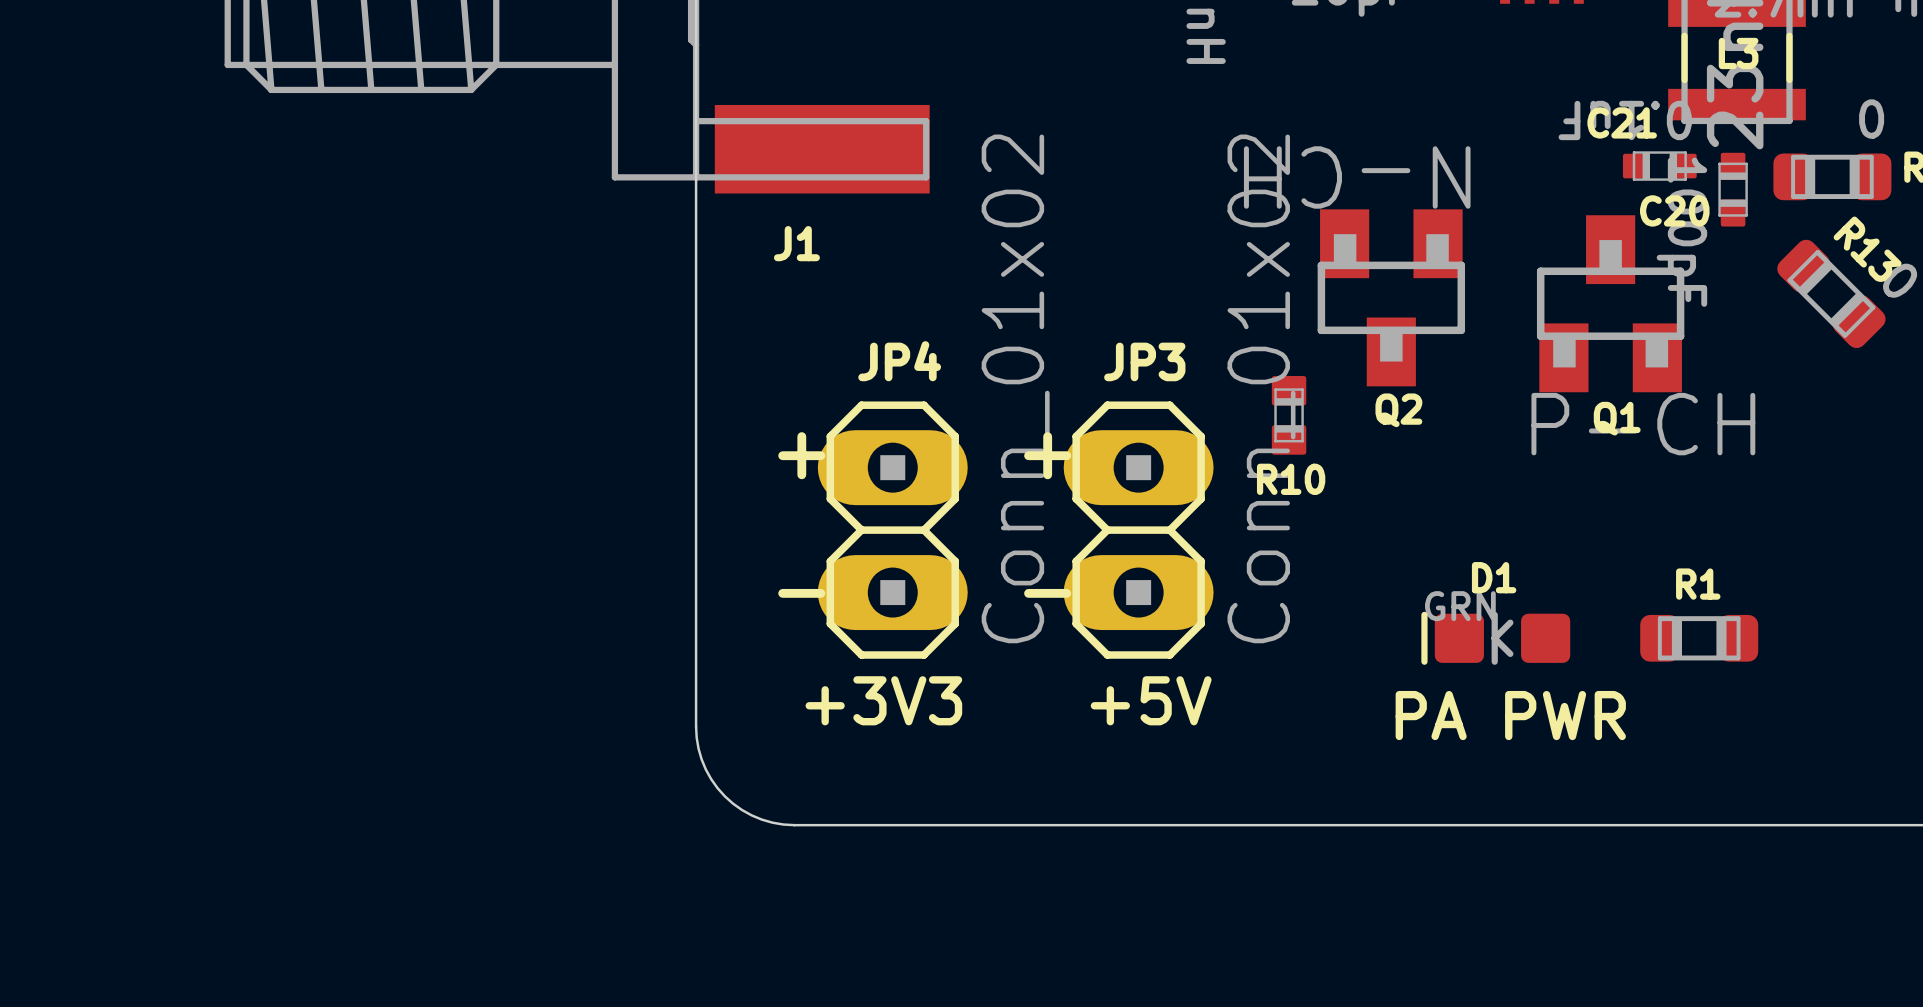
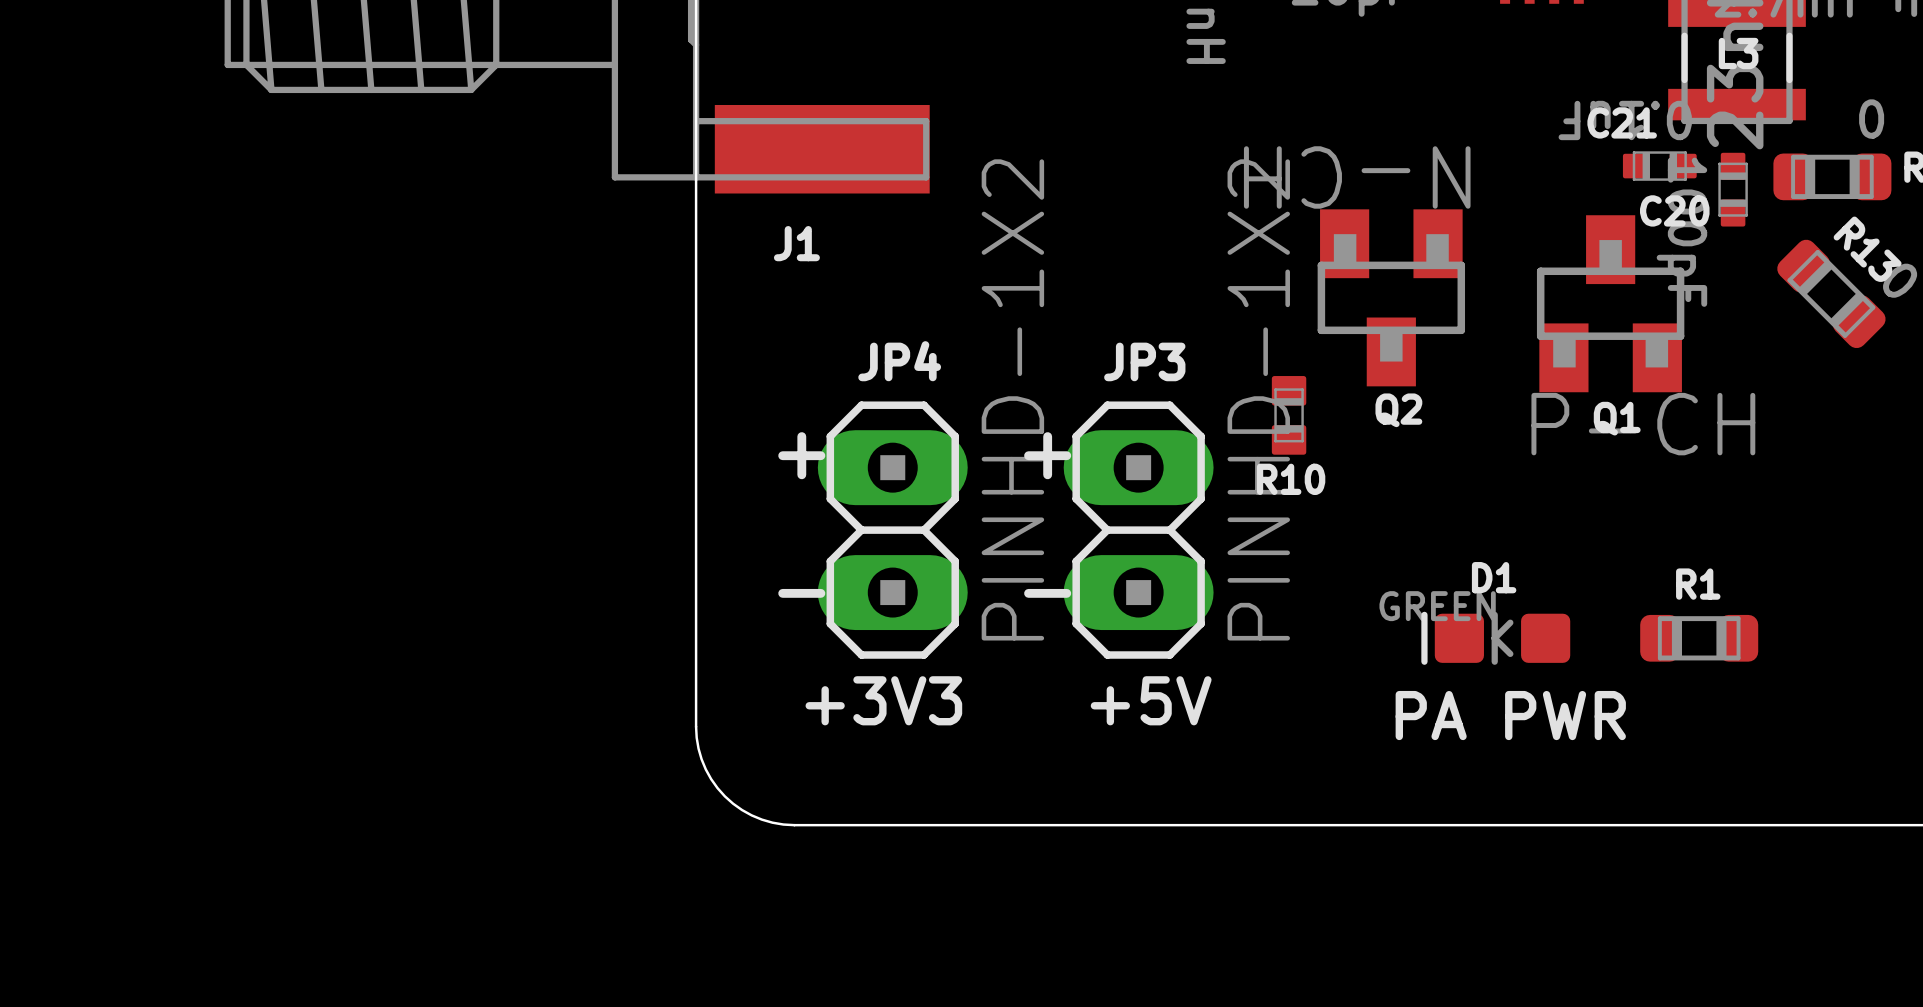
JP4 value: Conn_01x02 (1015, 388) -> PINHD-1X2 (1012, 399)
JP3 value: Conn_01x02 (1261, 388) -> PINHD-1X2 (1258, 399)
D1 value: GRN (1460, 606) -> GREEN (1437, 606)

